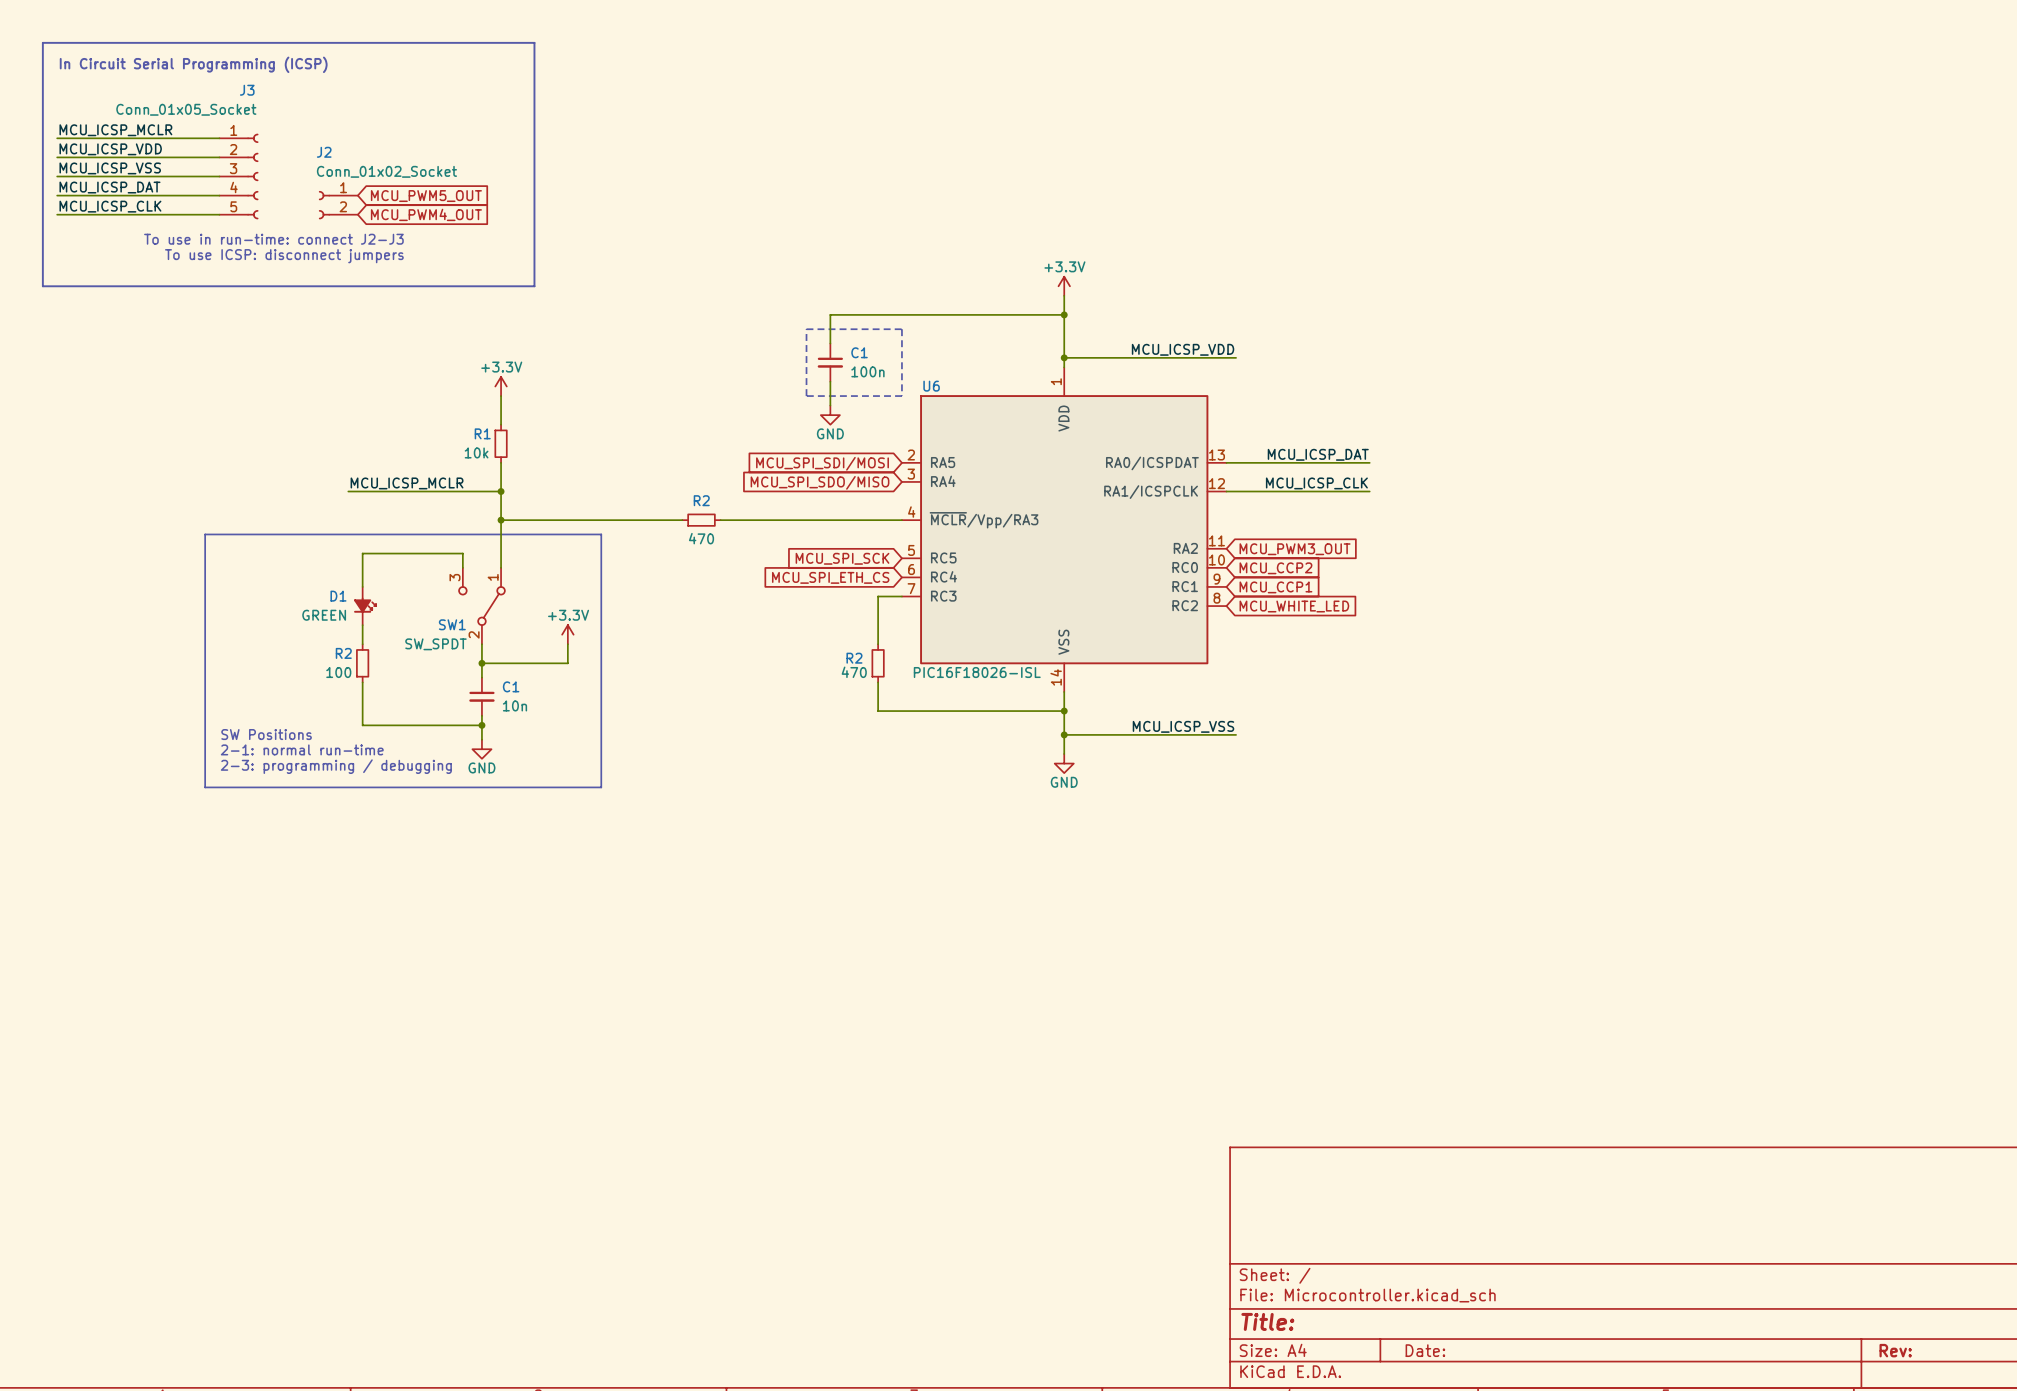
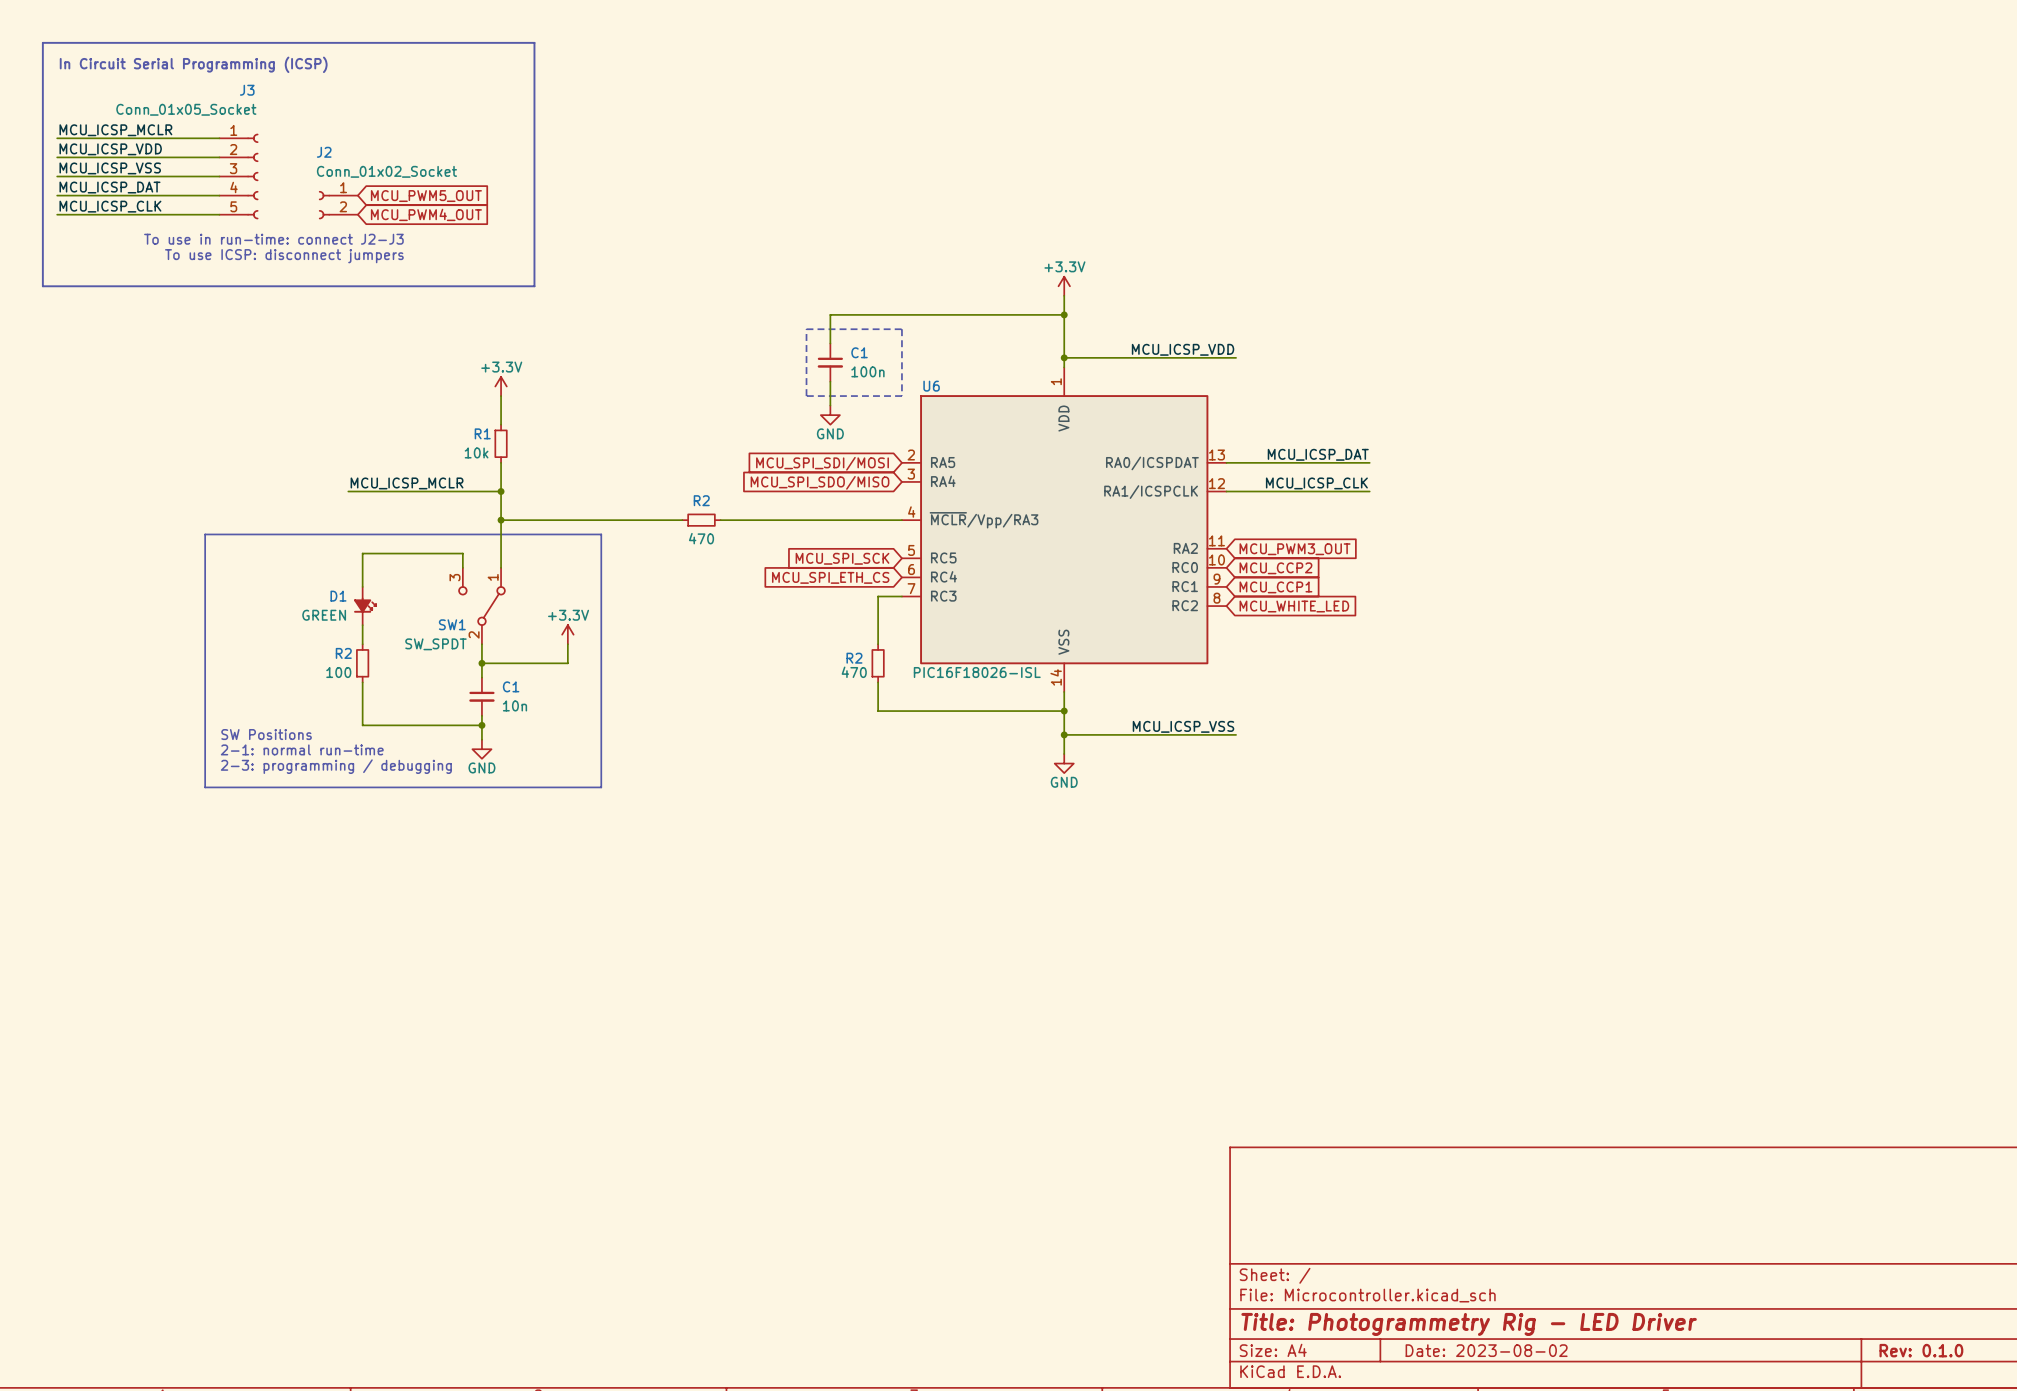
title block: Title: (1267, 1321) -> Title: Photogrammetry Rig - LED Driver (1469, 1324)
title block: Date: (1425, 1350) -> Date: 2023-08-02 (1486, 1350)
title block: Rev: (1895, 1350) -> Rev: 0.1.0 (1921, 1350)

